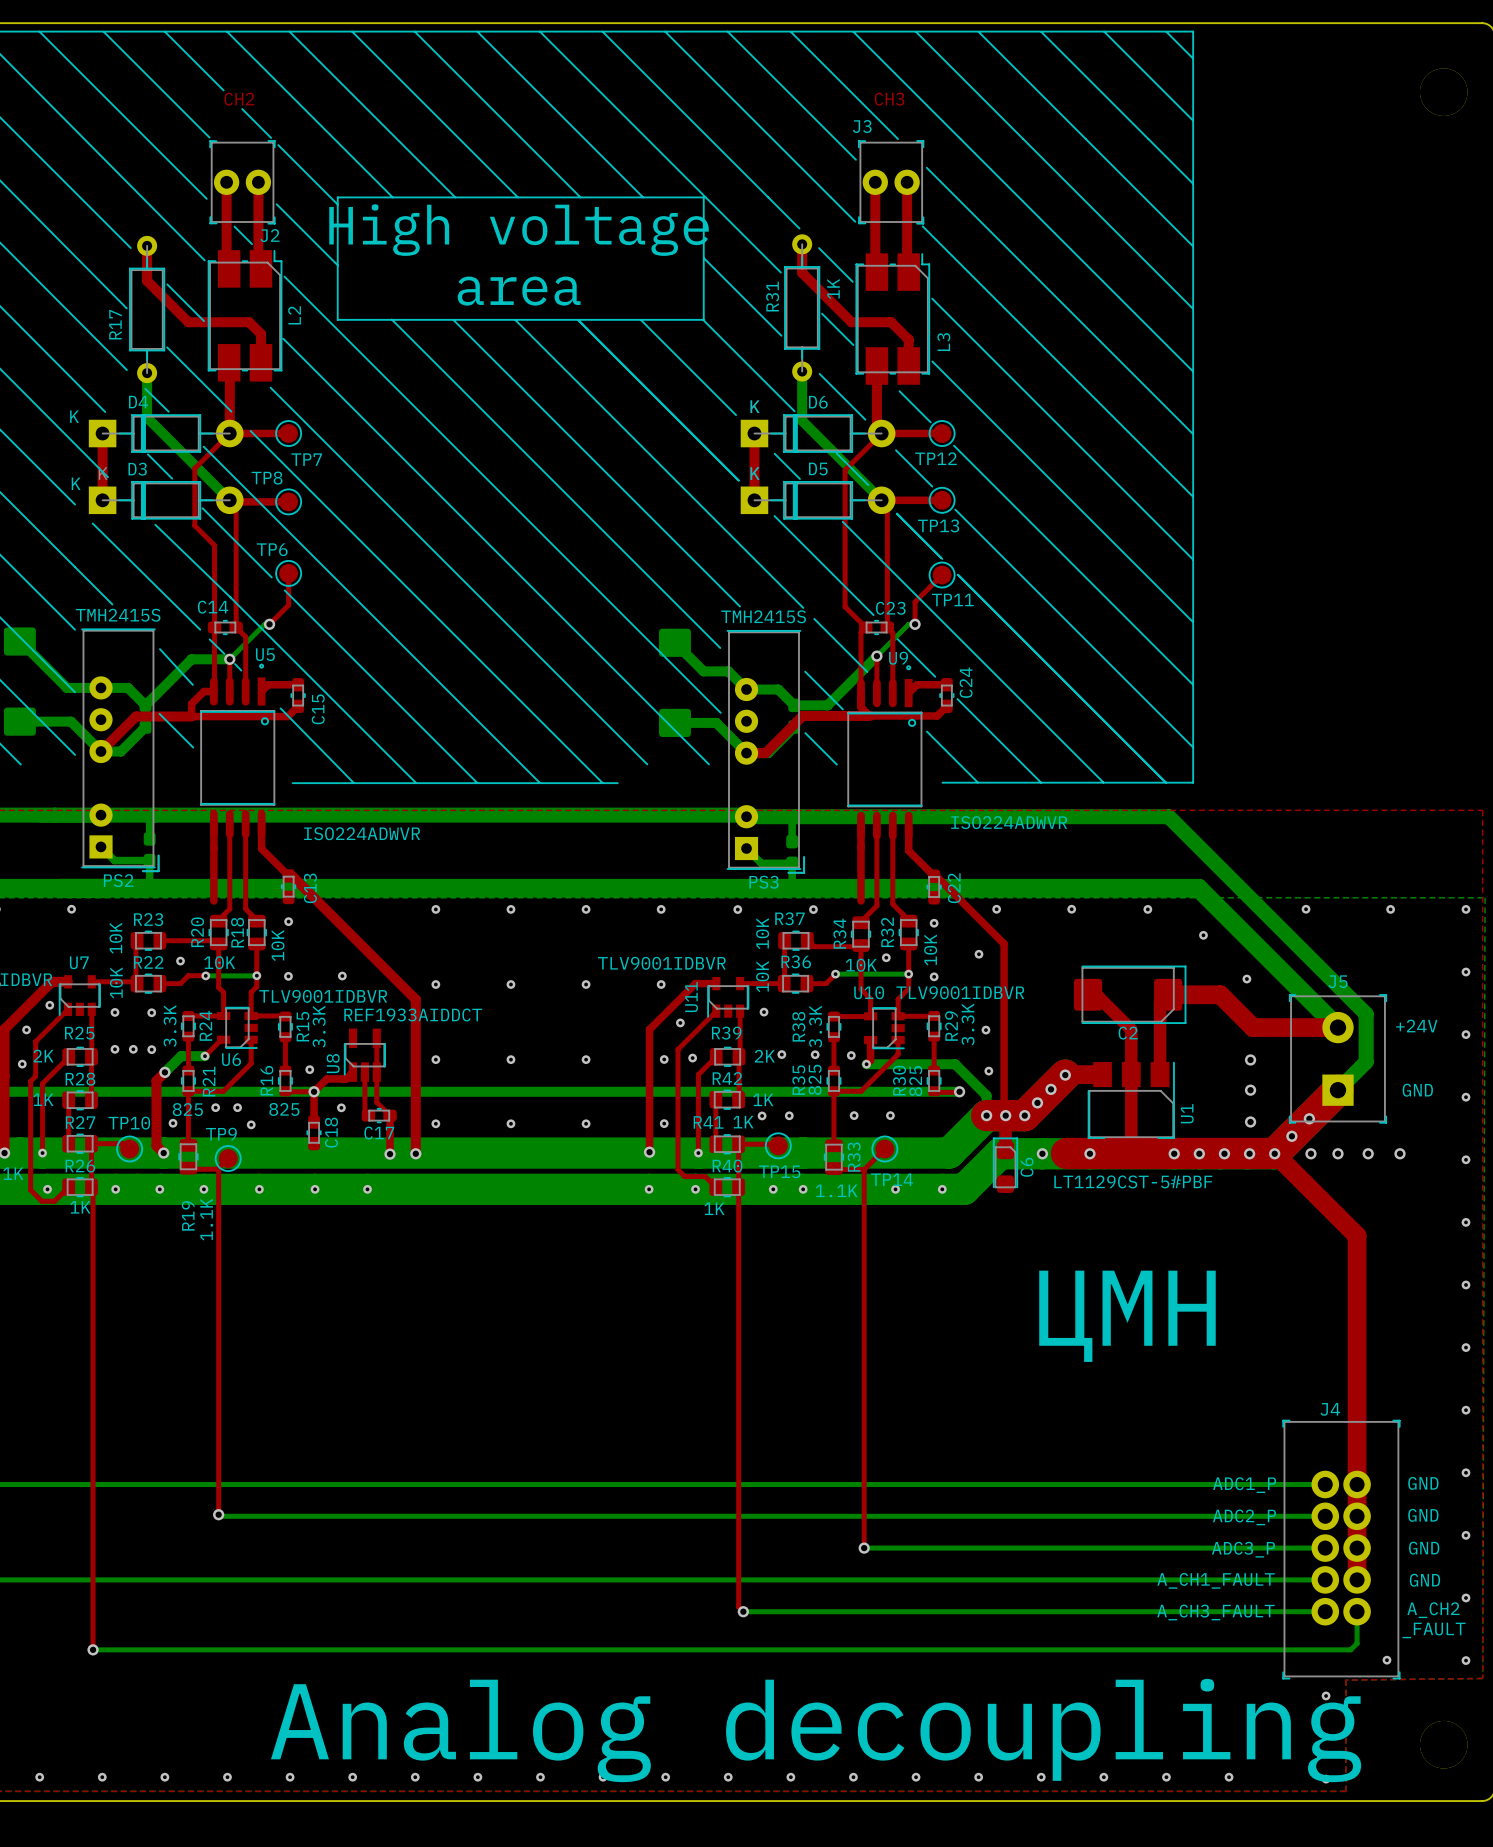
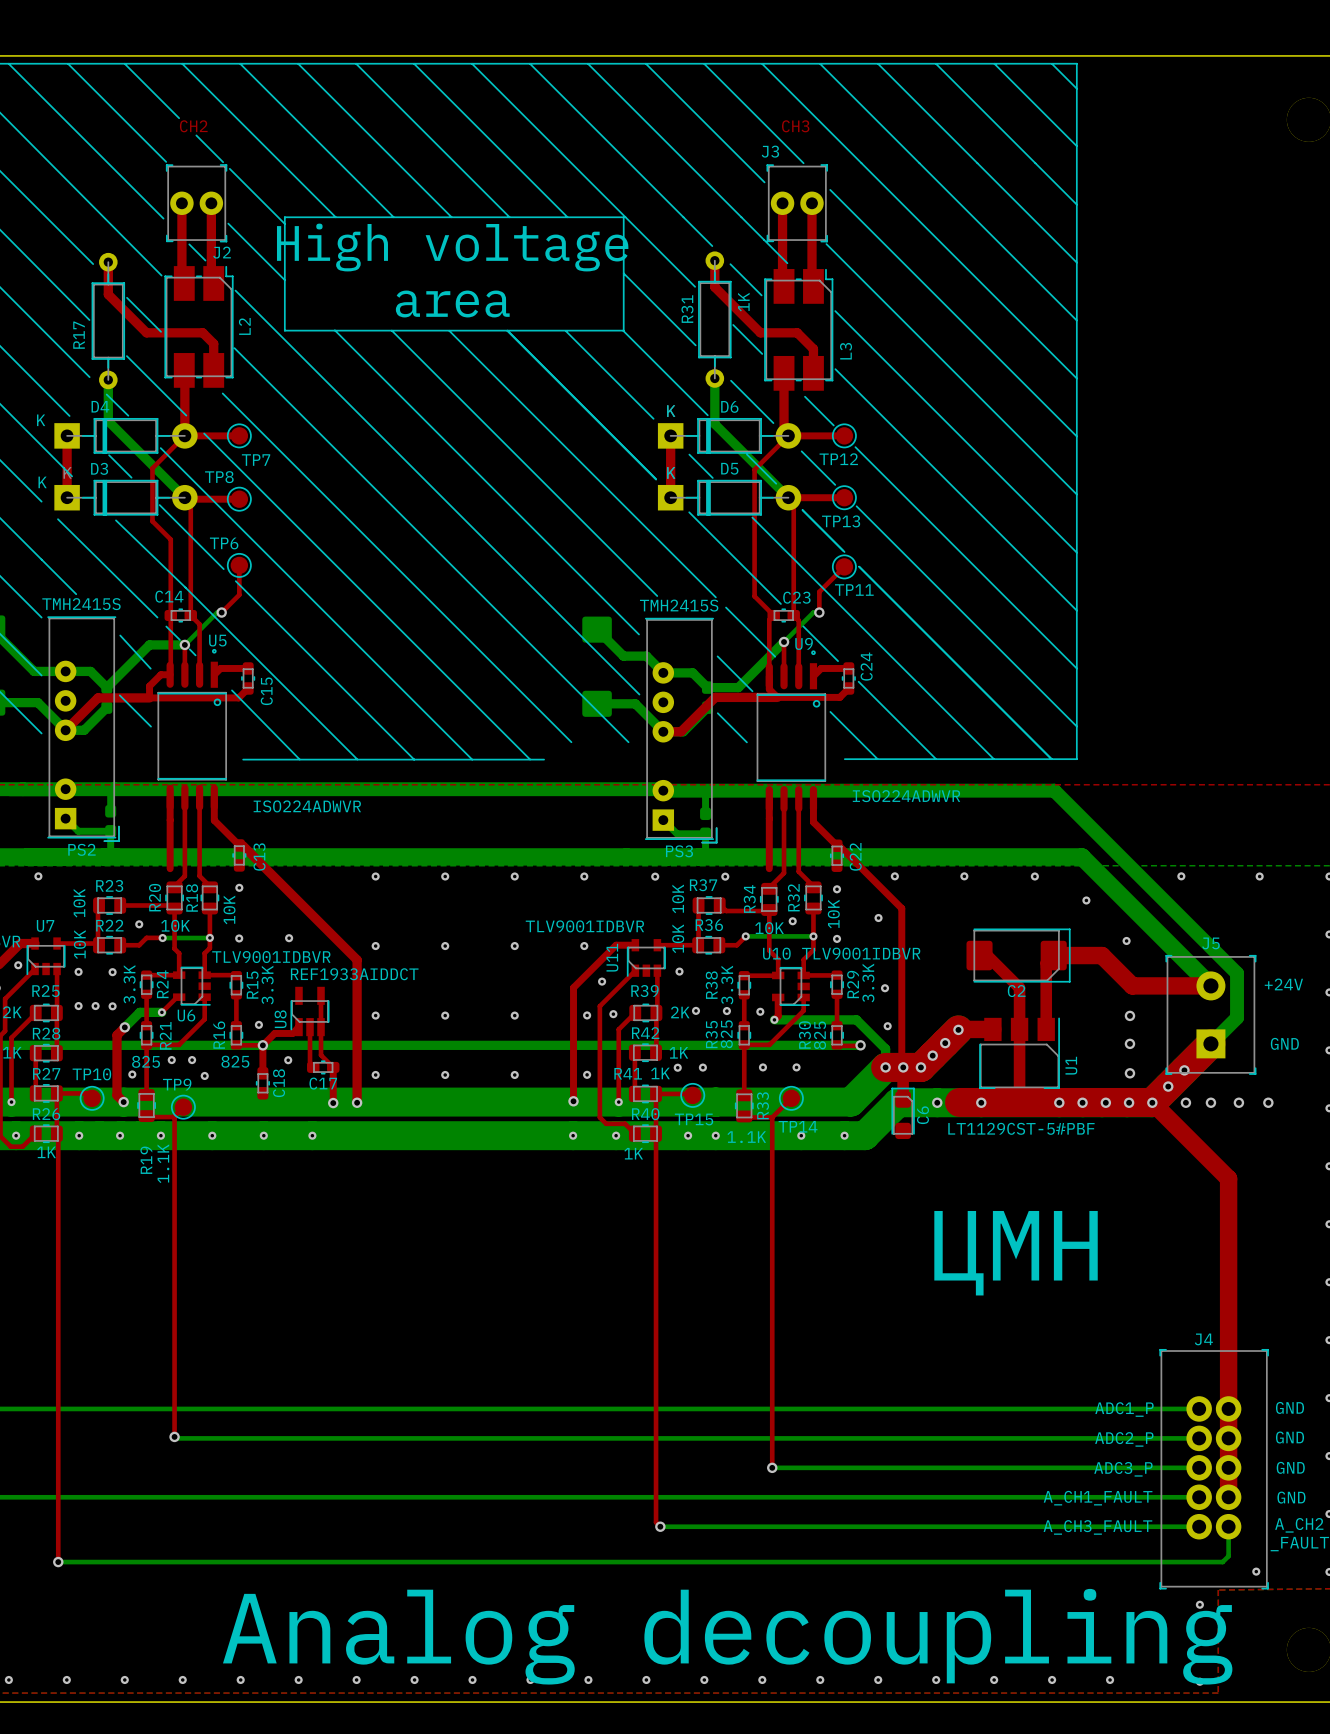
line: none -> (764, 239) (787, 263)

